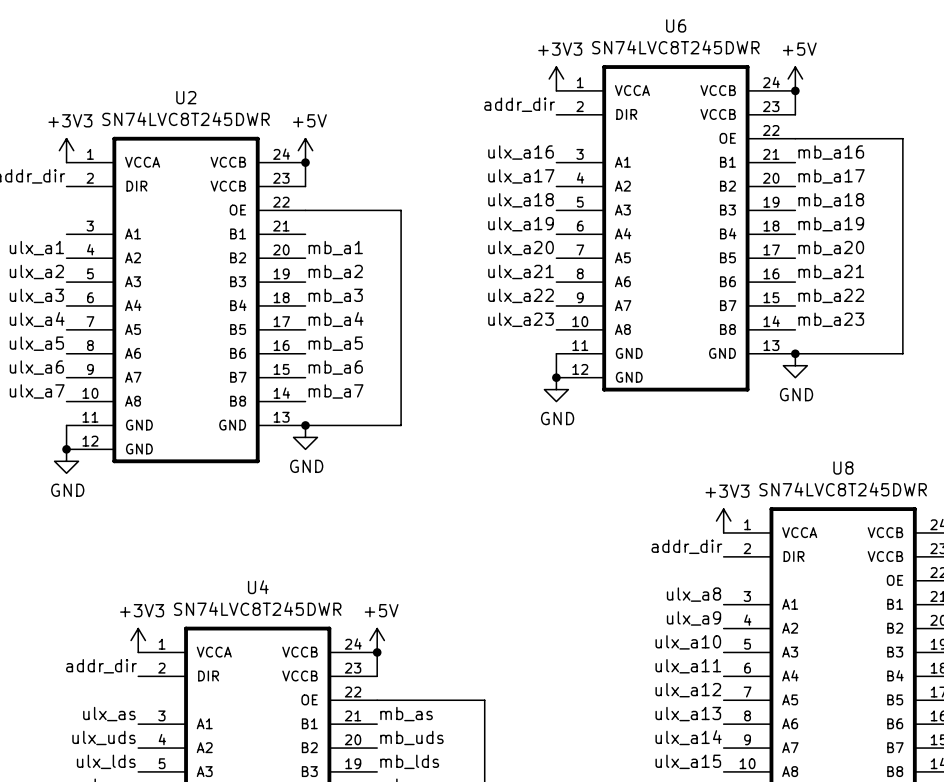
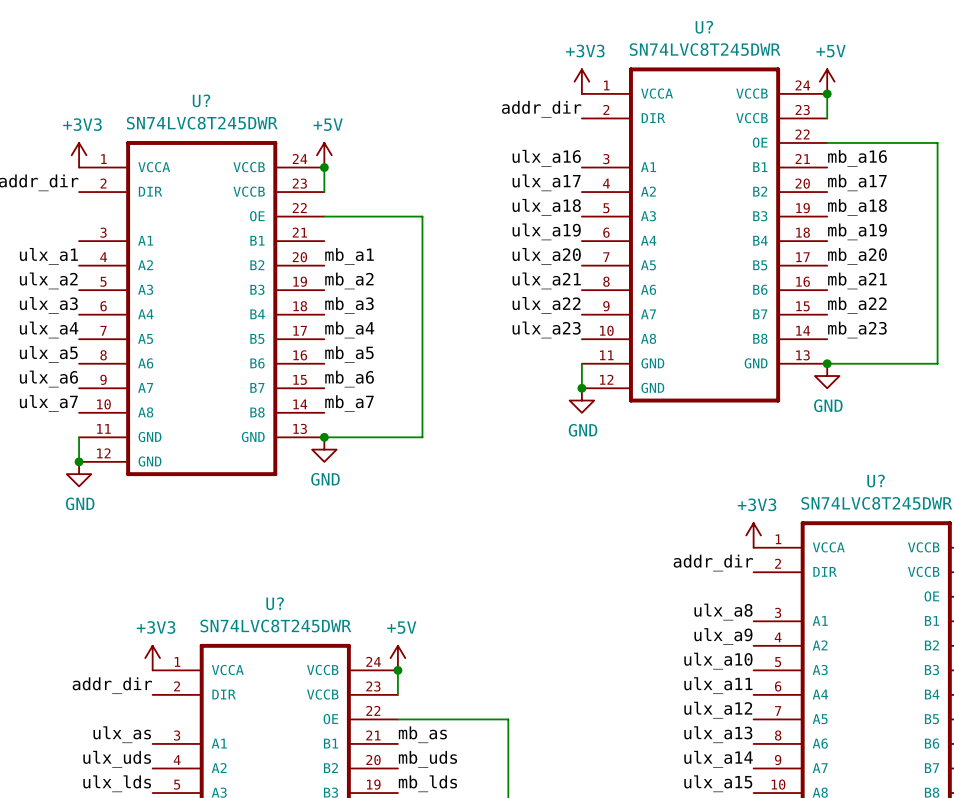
U6 name: U6 (676, 25) -> U? (704, 27)
U2 name: U2 (186, 97) -> U? (201, 100)
U8 name: U8 (843, 468) -> U? (876, 481)
U4 name: U4 (258, 587) -> U? (275, 603)

